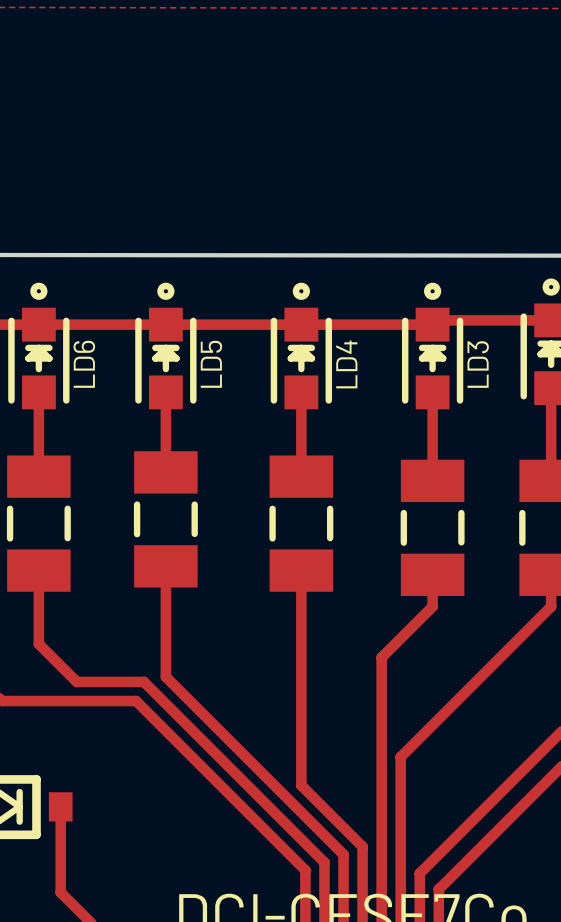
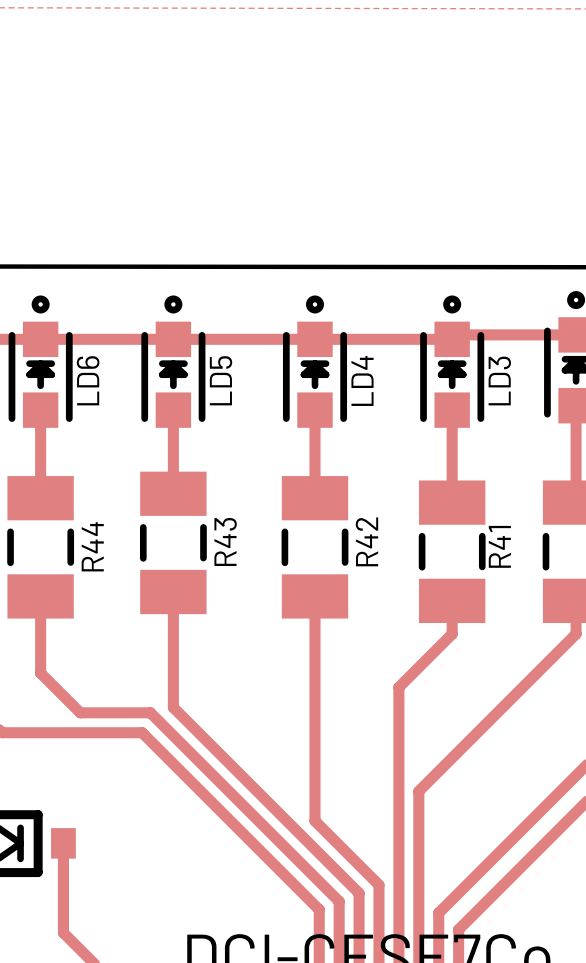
R43 name: none -> R43 (225, 541)
R42 name: none -> R42 (366, 541)
R44 name: none -> R44 (92, 546)
R41 name: none -> R41 (499, 546)

